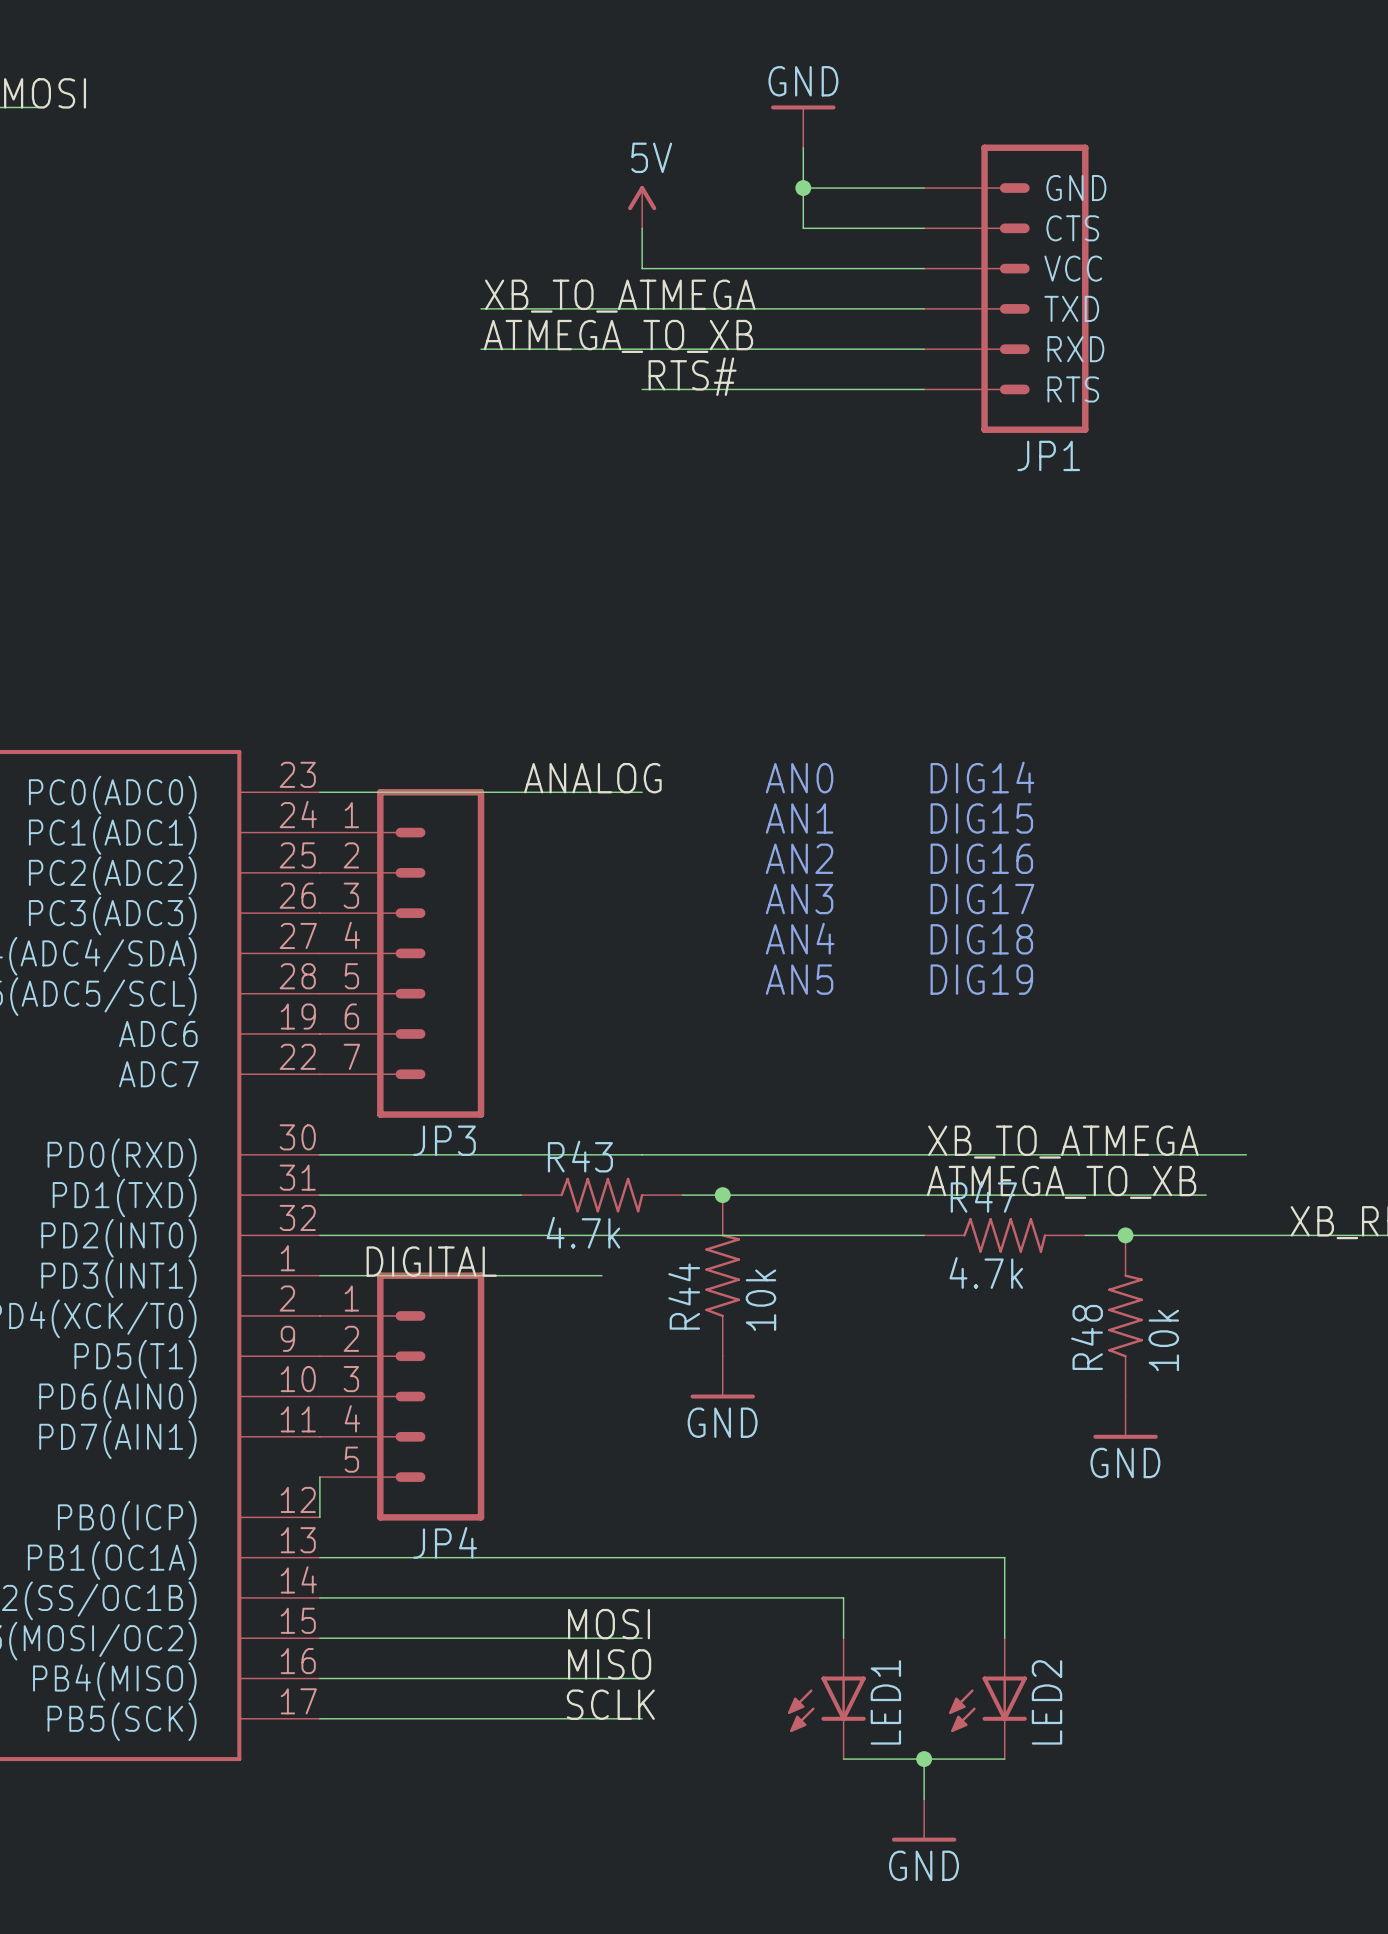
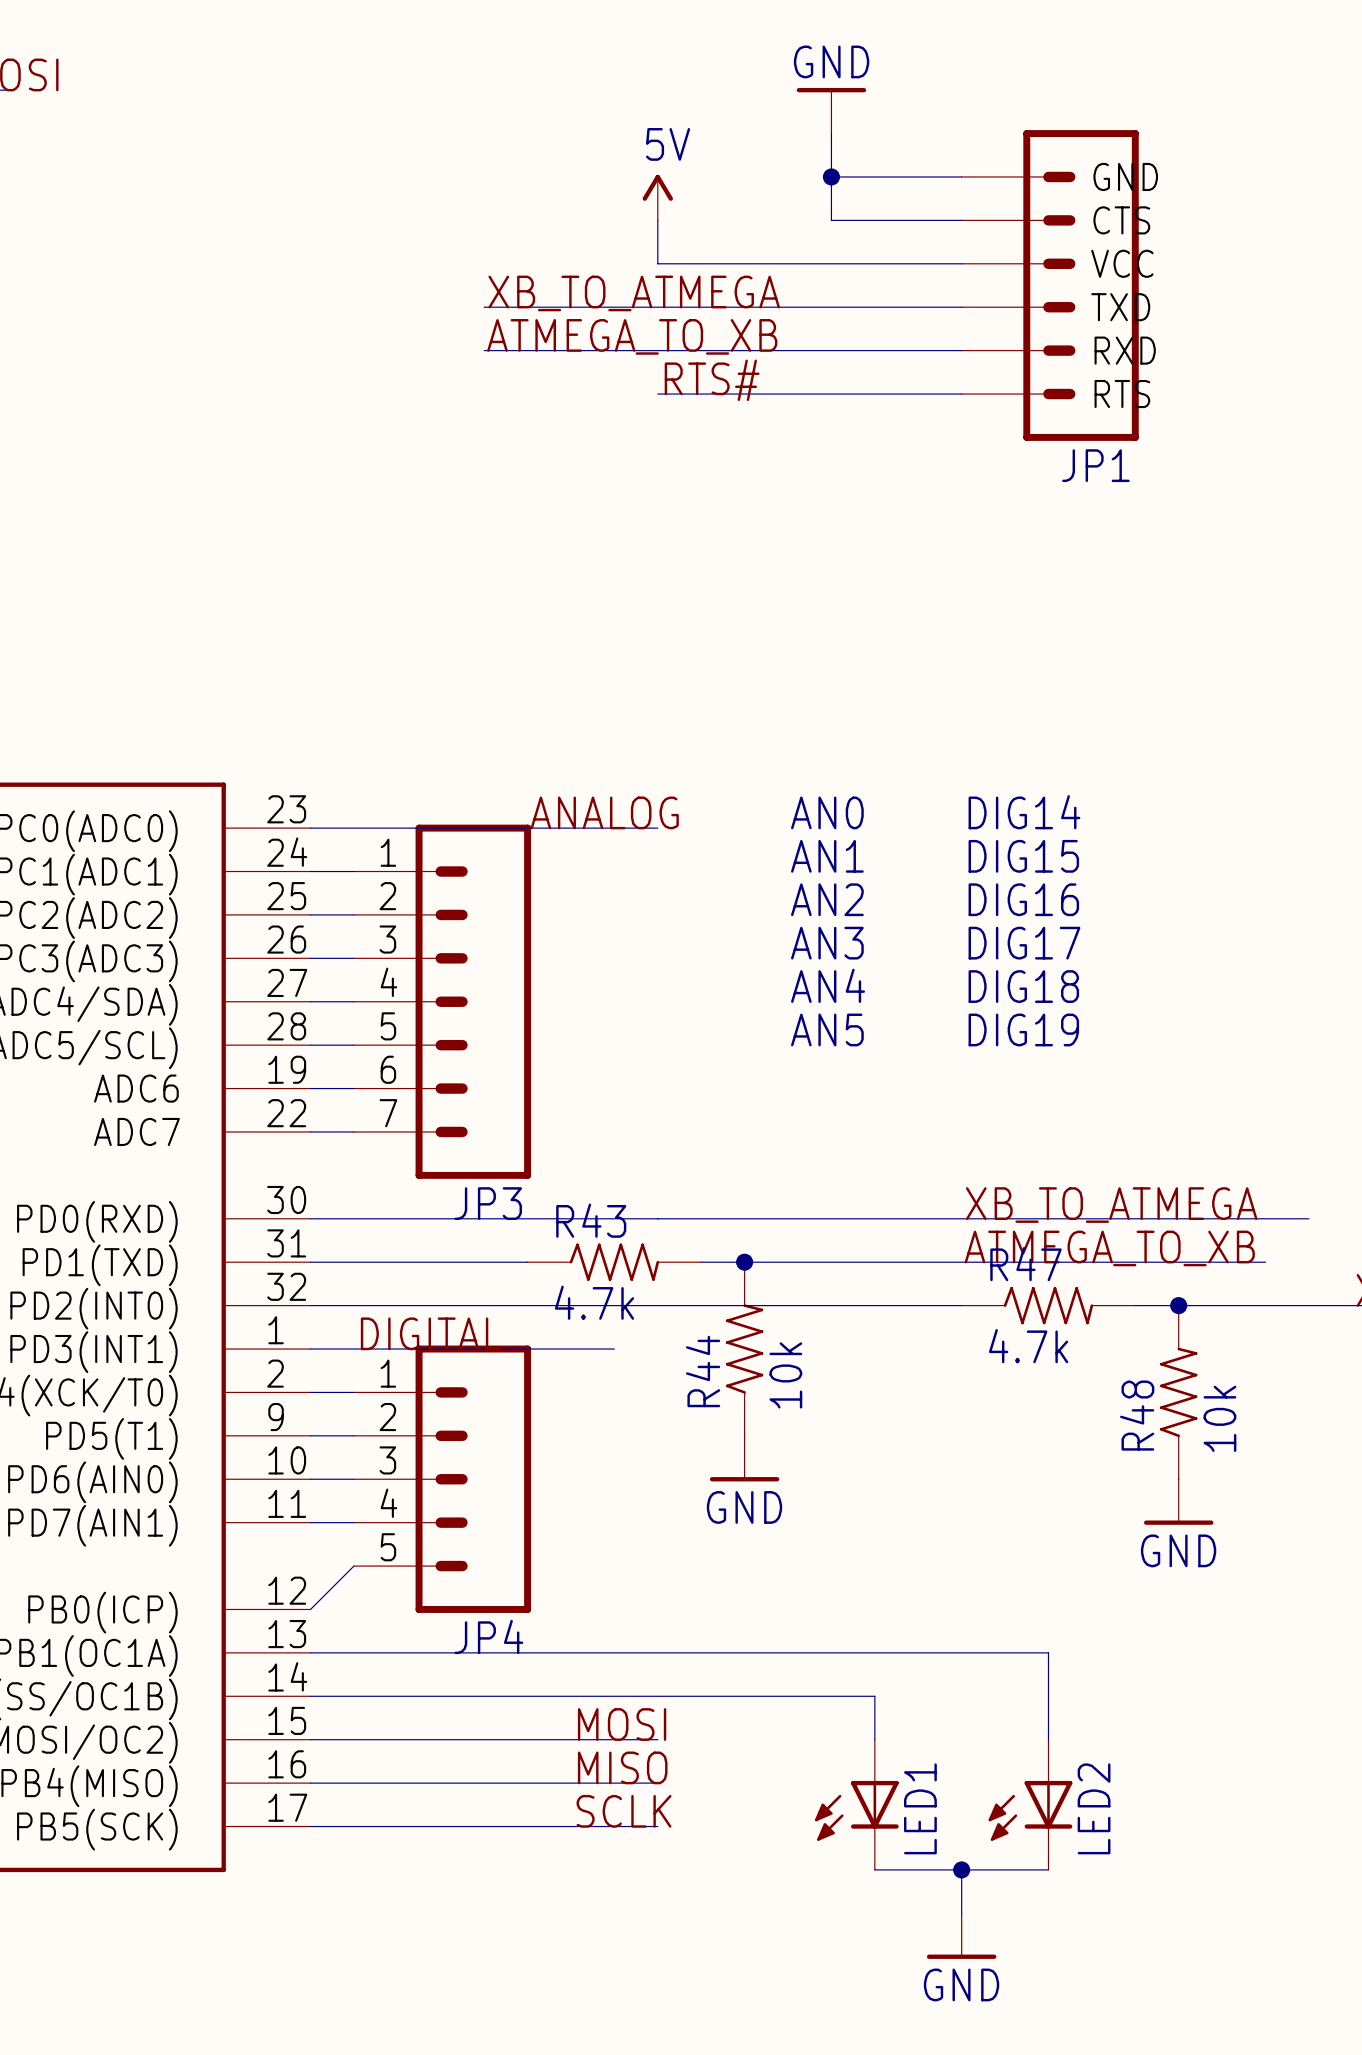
JP3 position: (402, 953) -> (442, 1001)
JP4 position: (402, 1396) -> (442, 1479)
wire: (319, 1477) (319, 1517) -> (353, 1566) (310, 1609)

